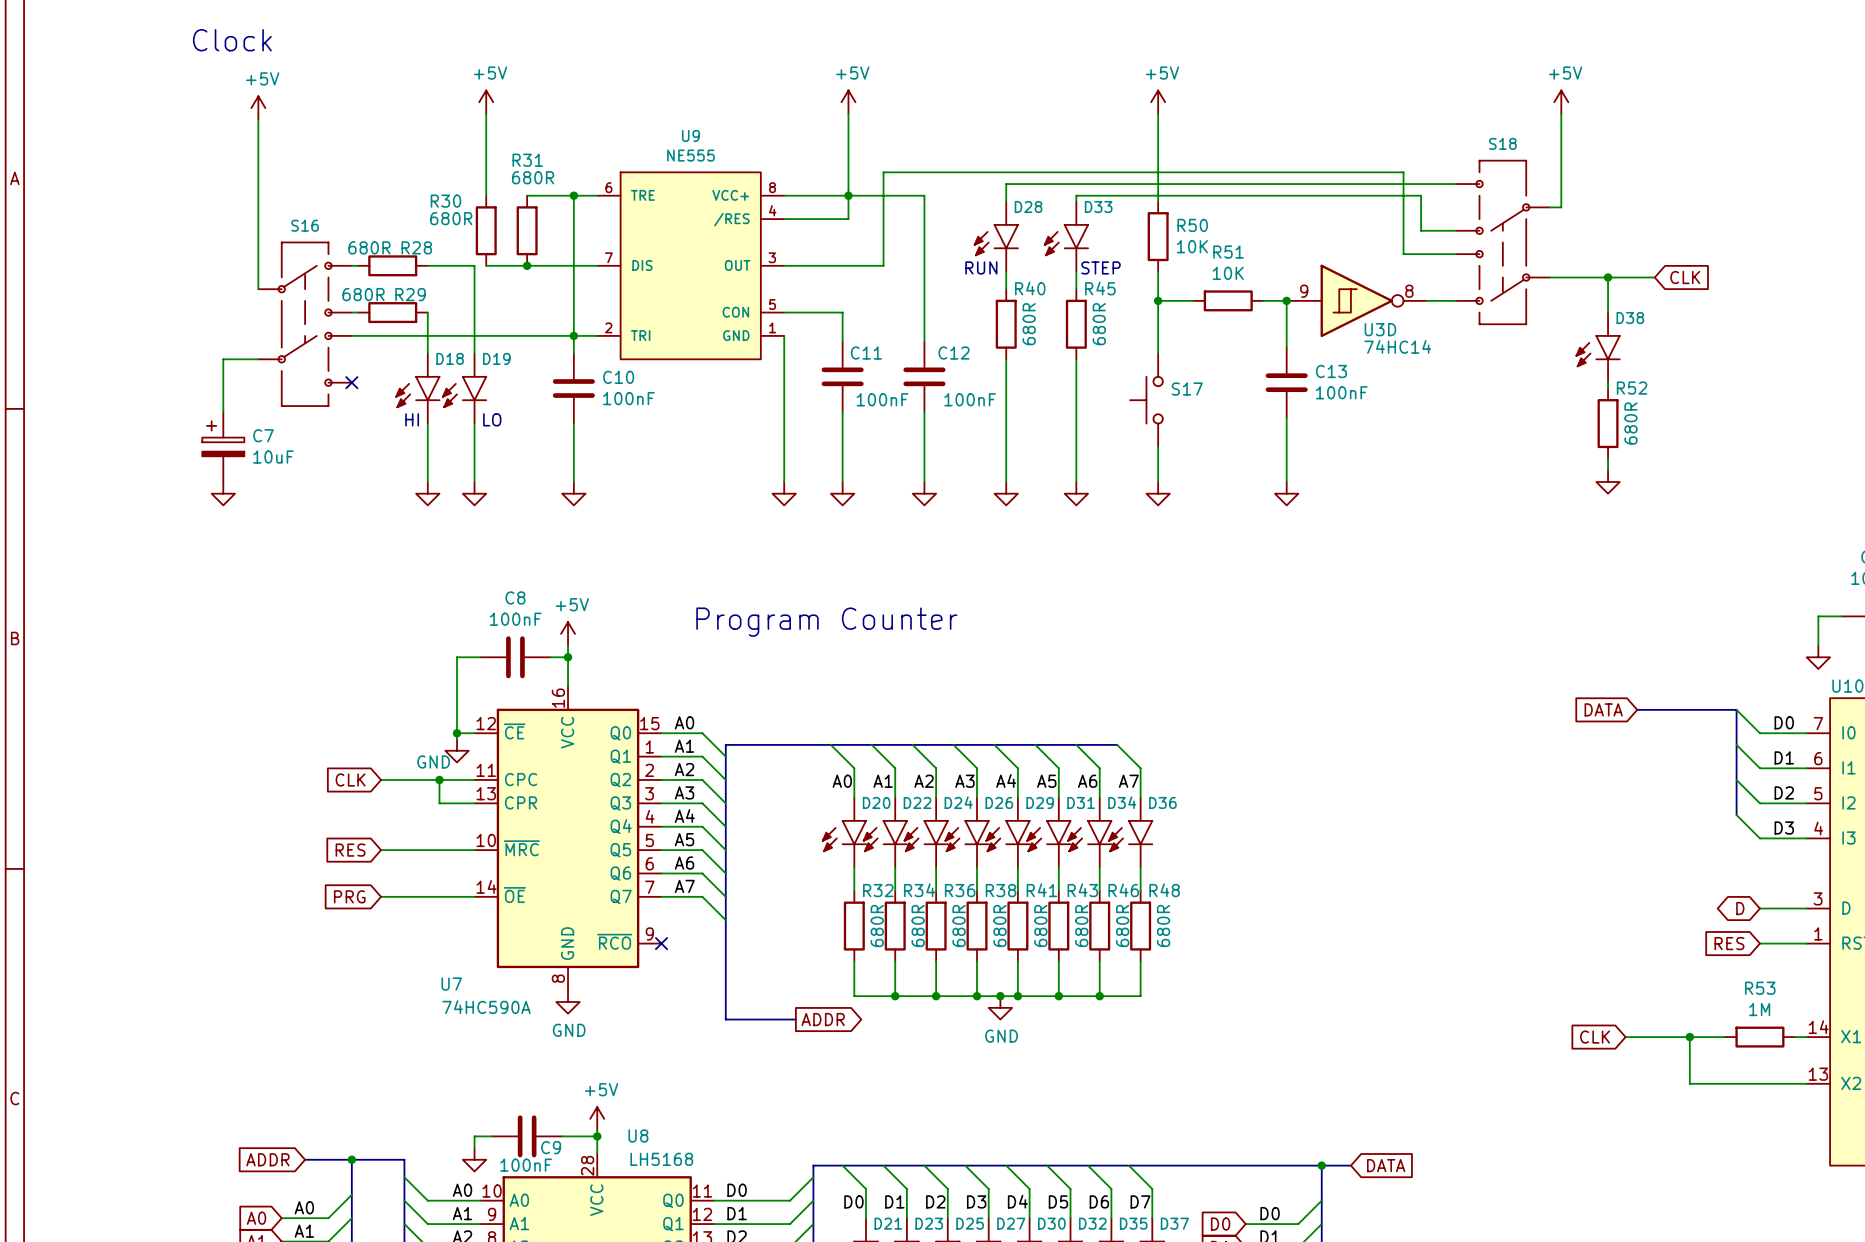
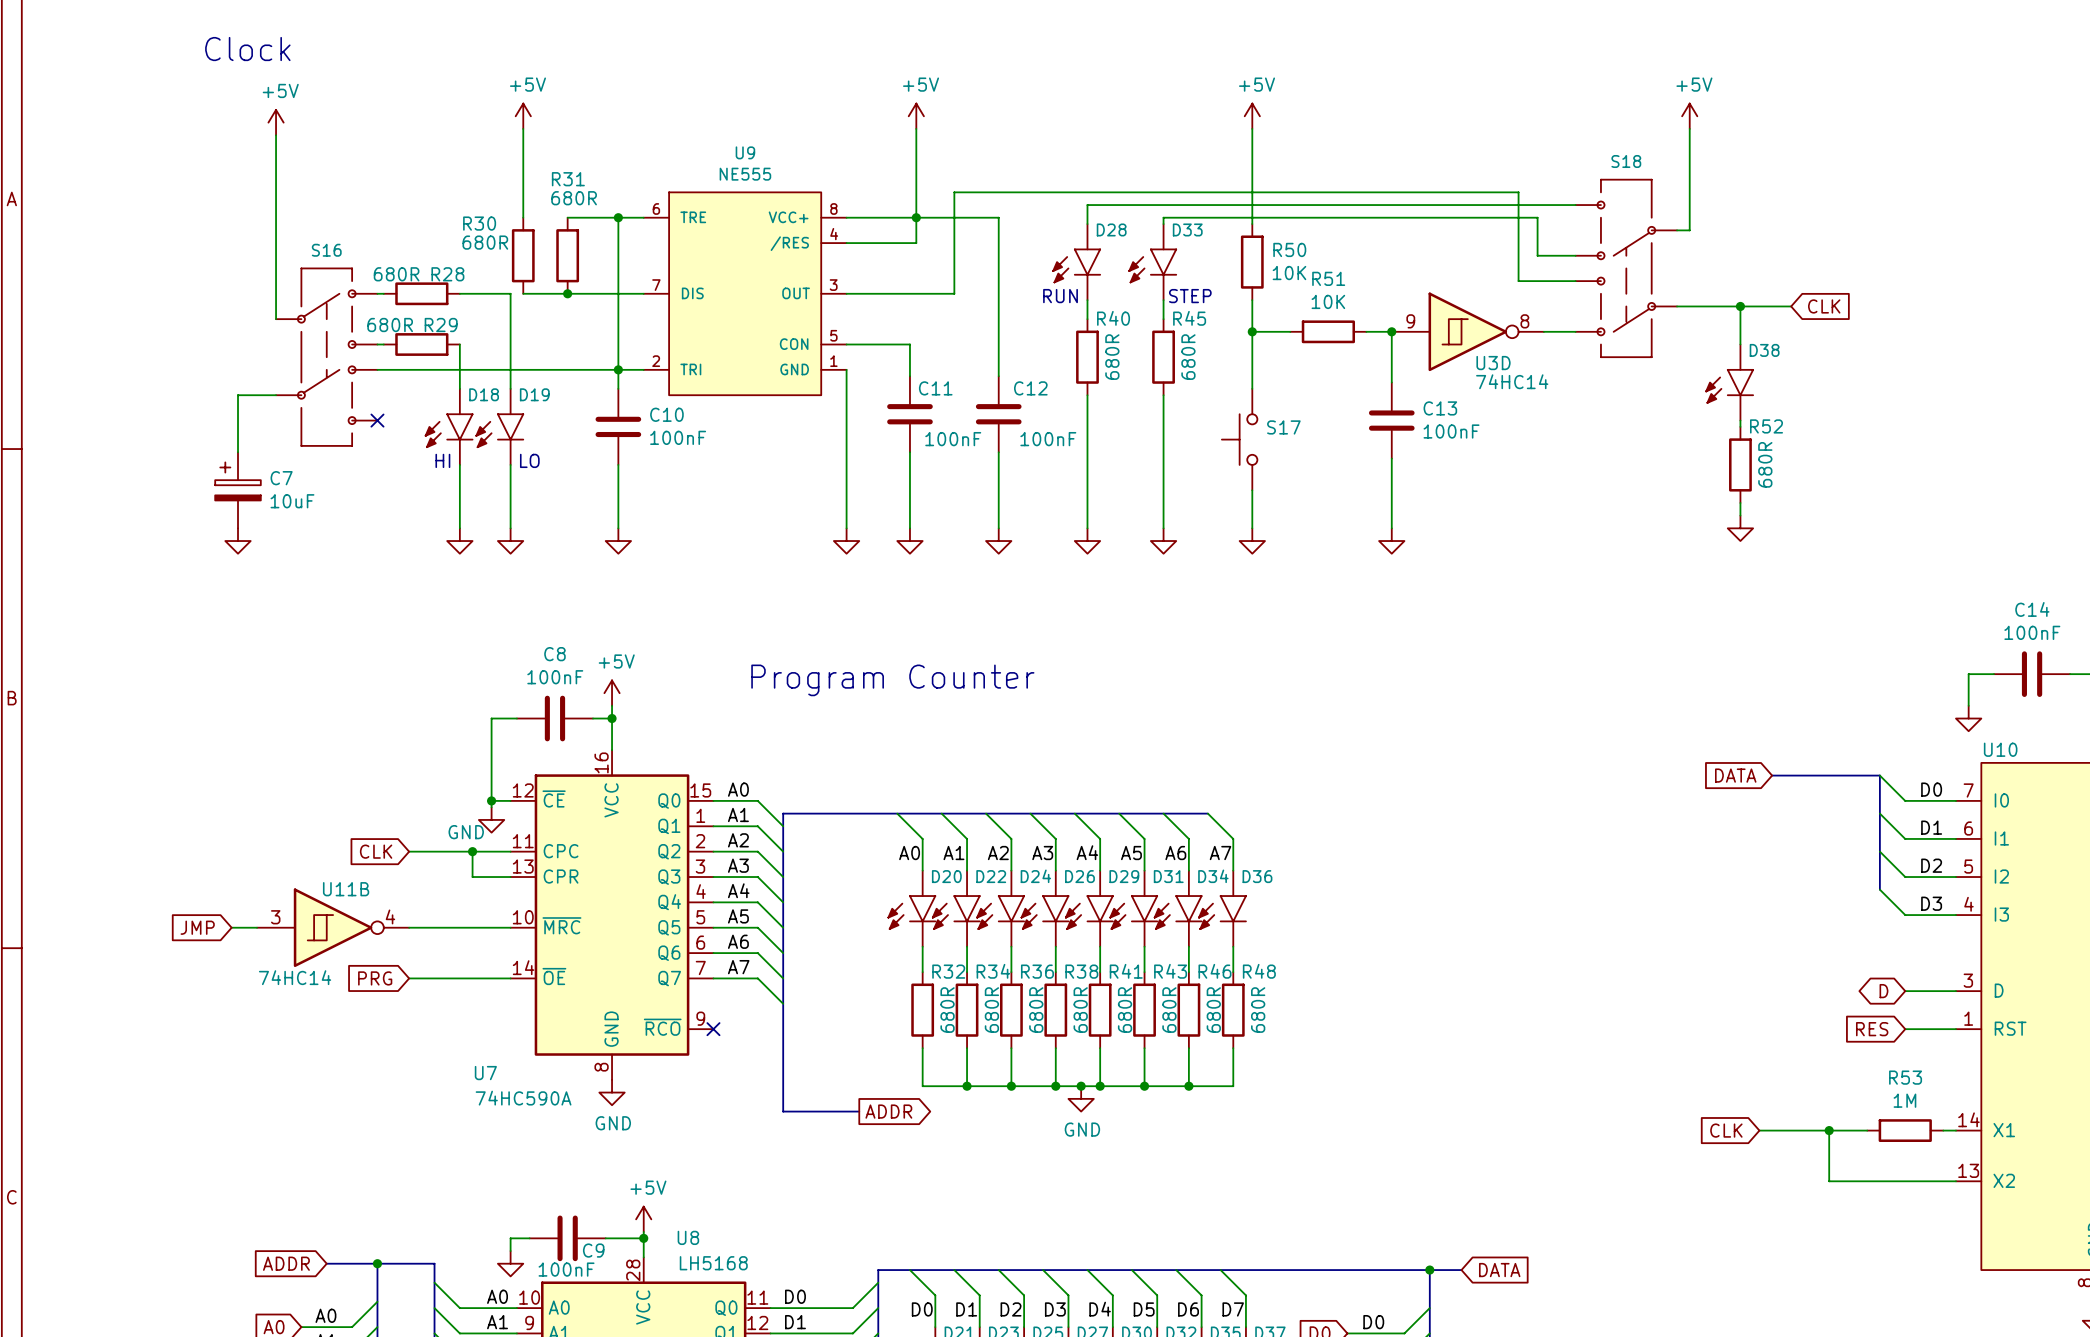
global label: none -> JMP (197, 927)
wire: none -> (231, 927) (257, 927)
U11B: none -> 74HC14 (333, 927)
global label: RES (350, 850) -> none

